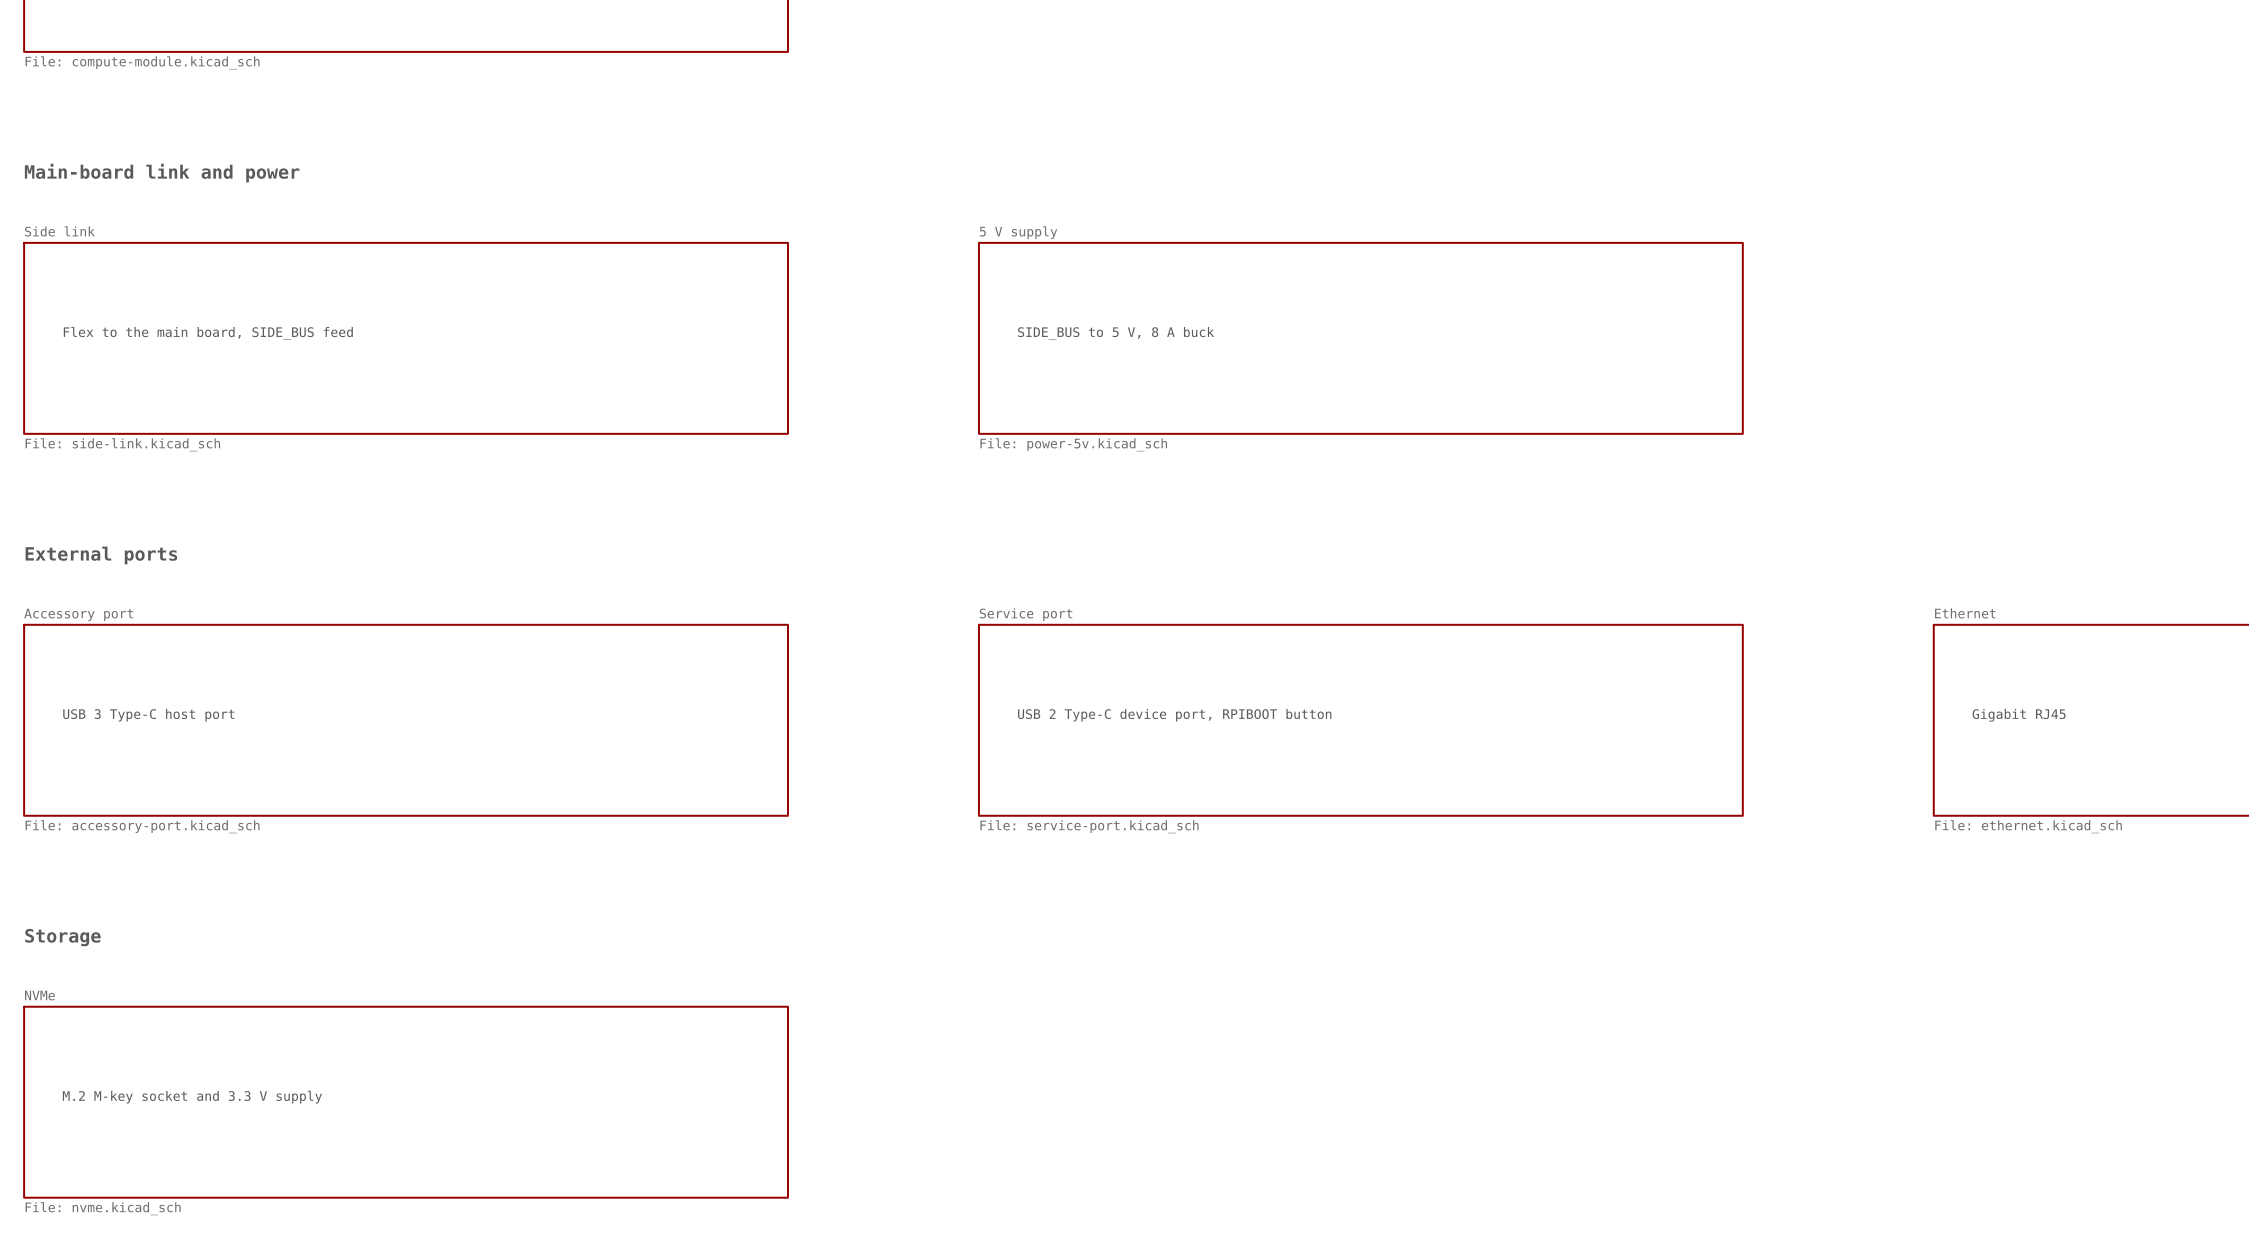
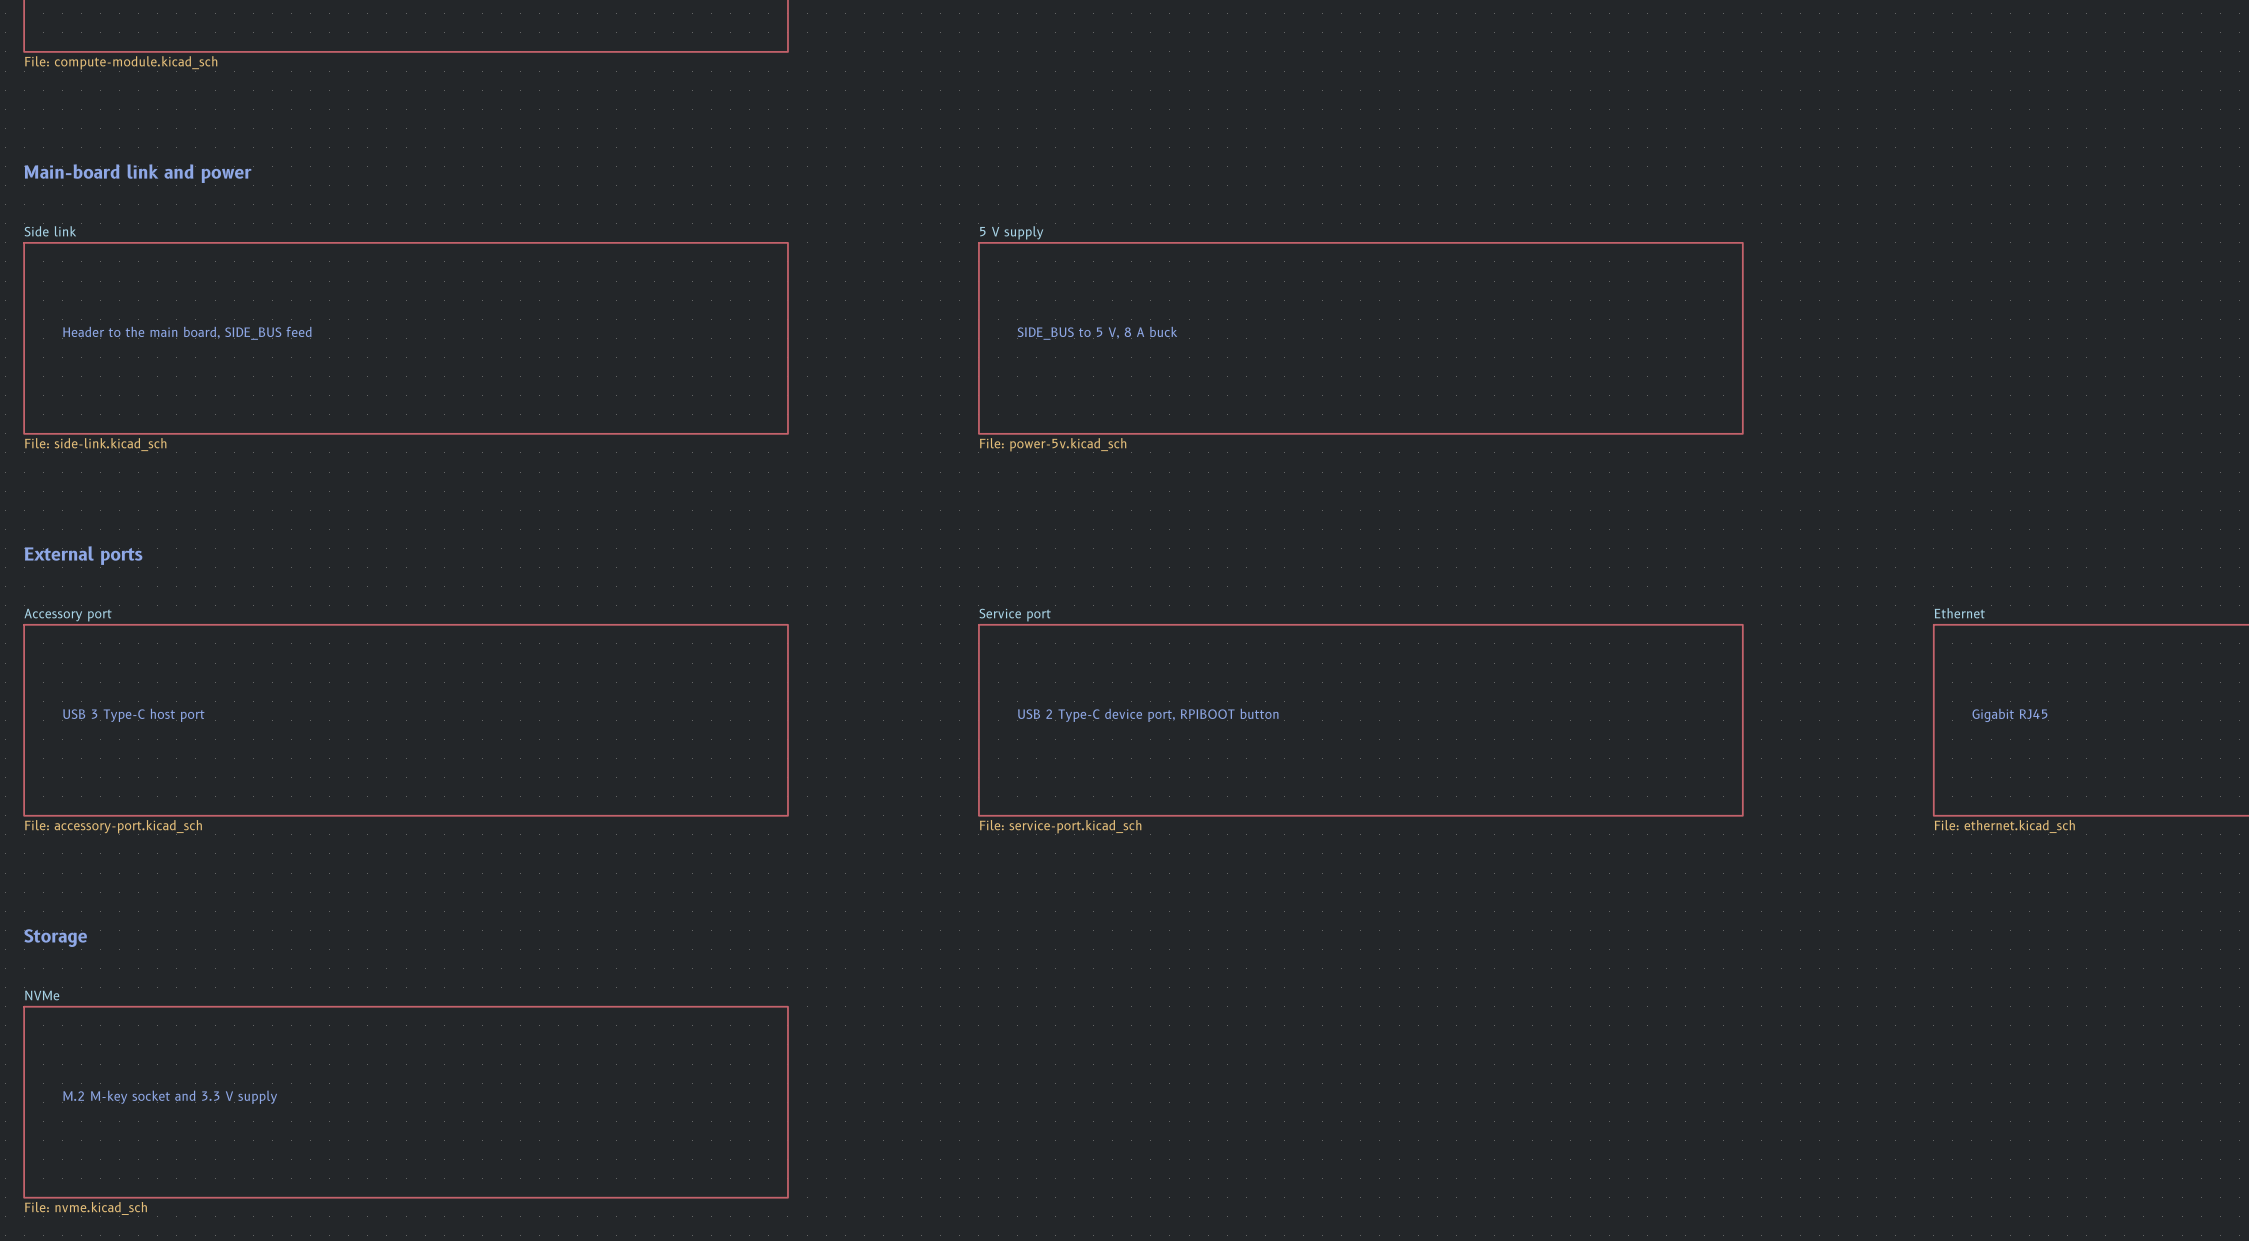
text: Flex to the main board, SIDE_BUS feed (208, 333) -> Header to the main board, SIDE_BUS feed (187, 333)

